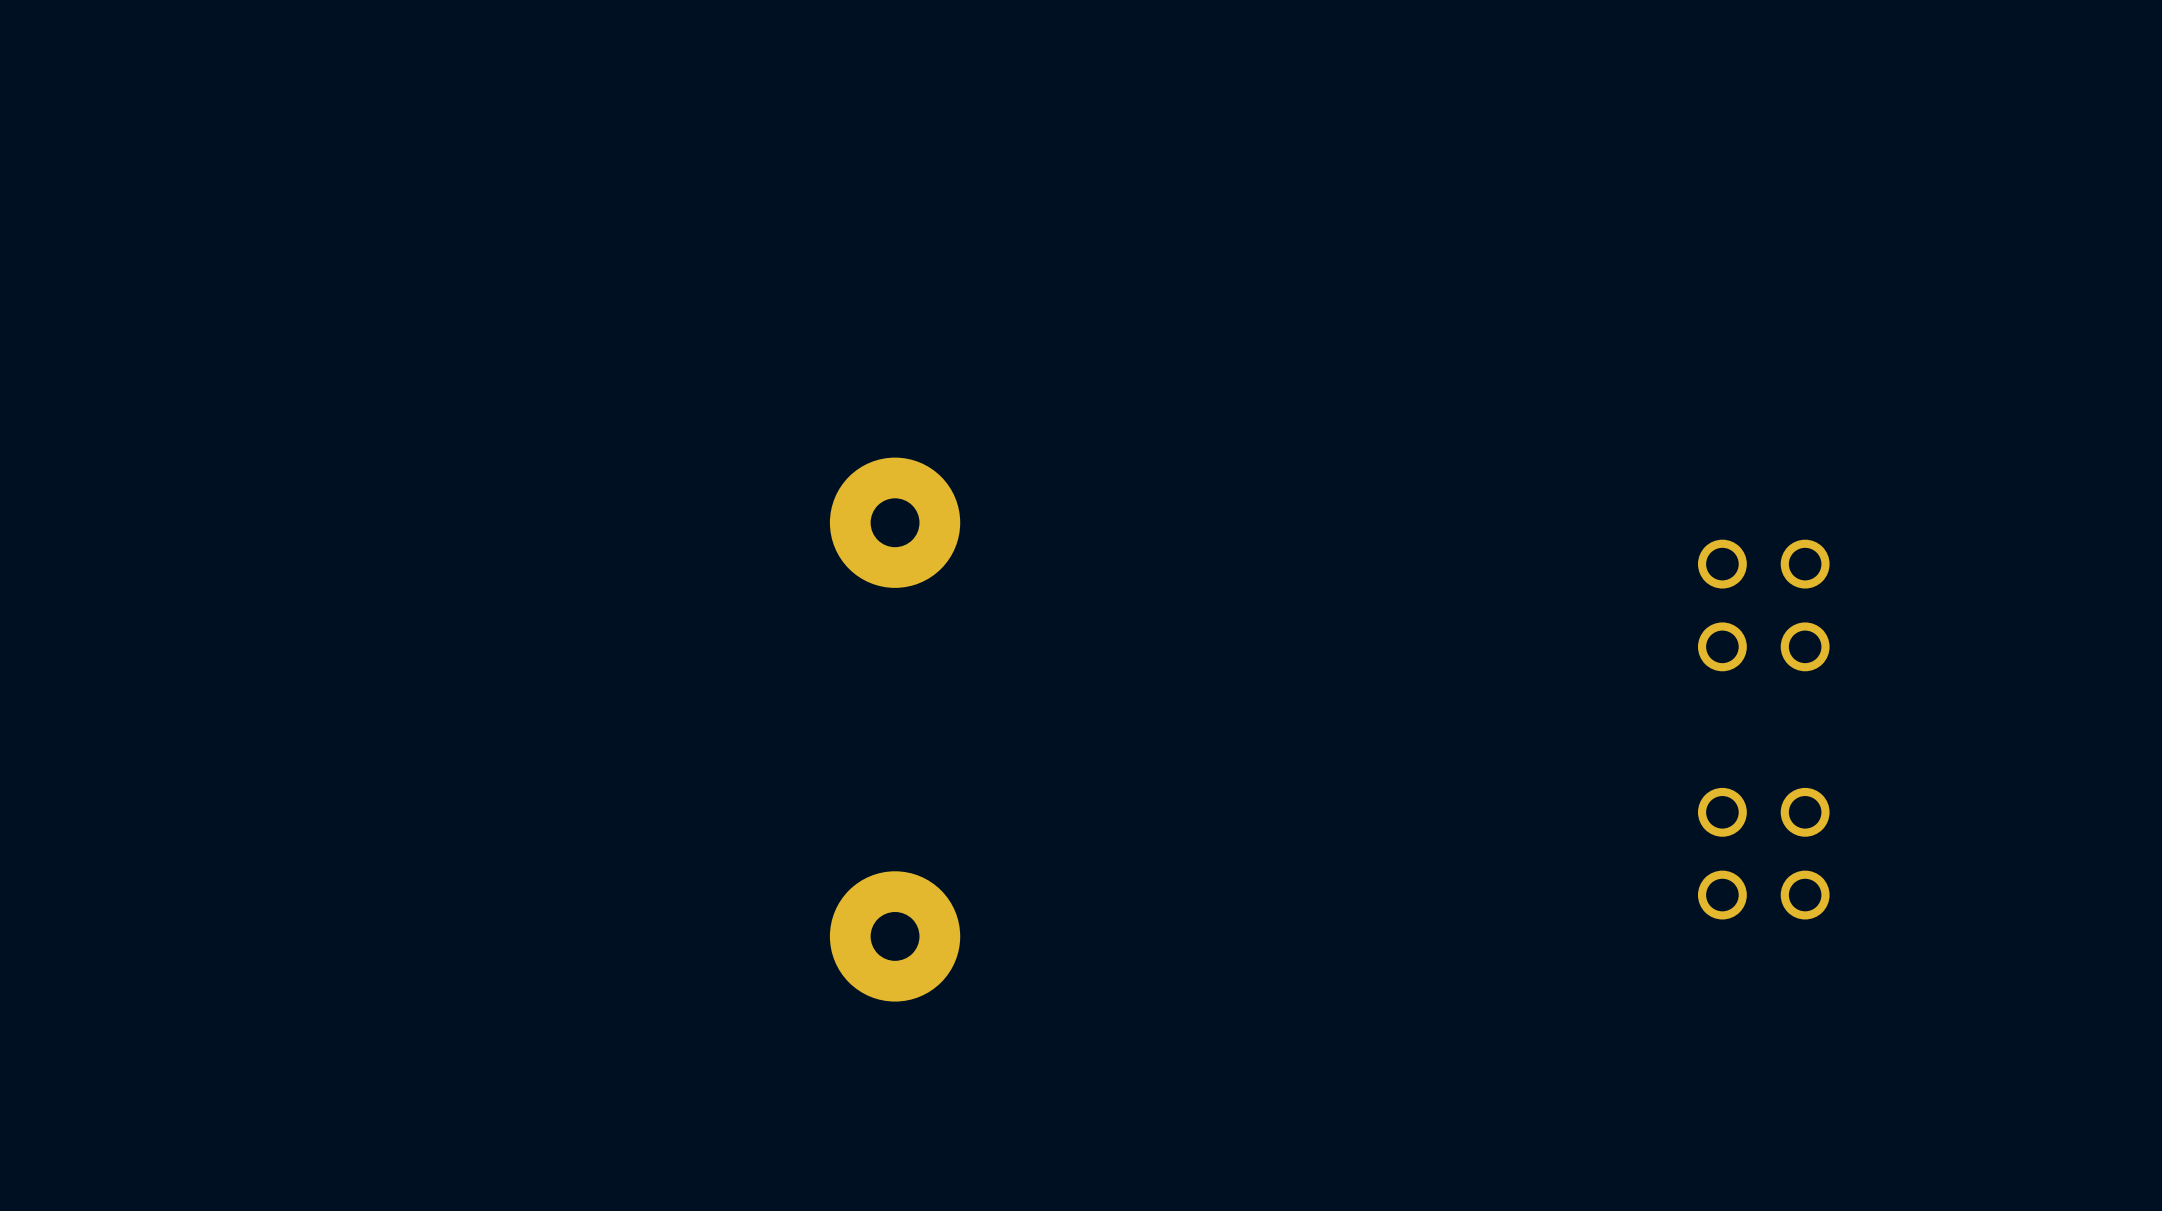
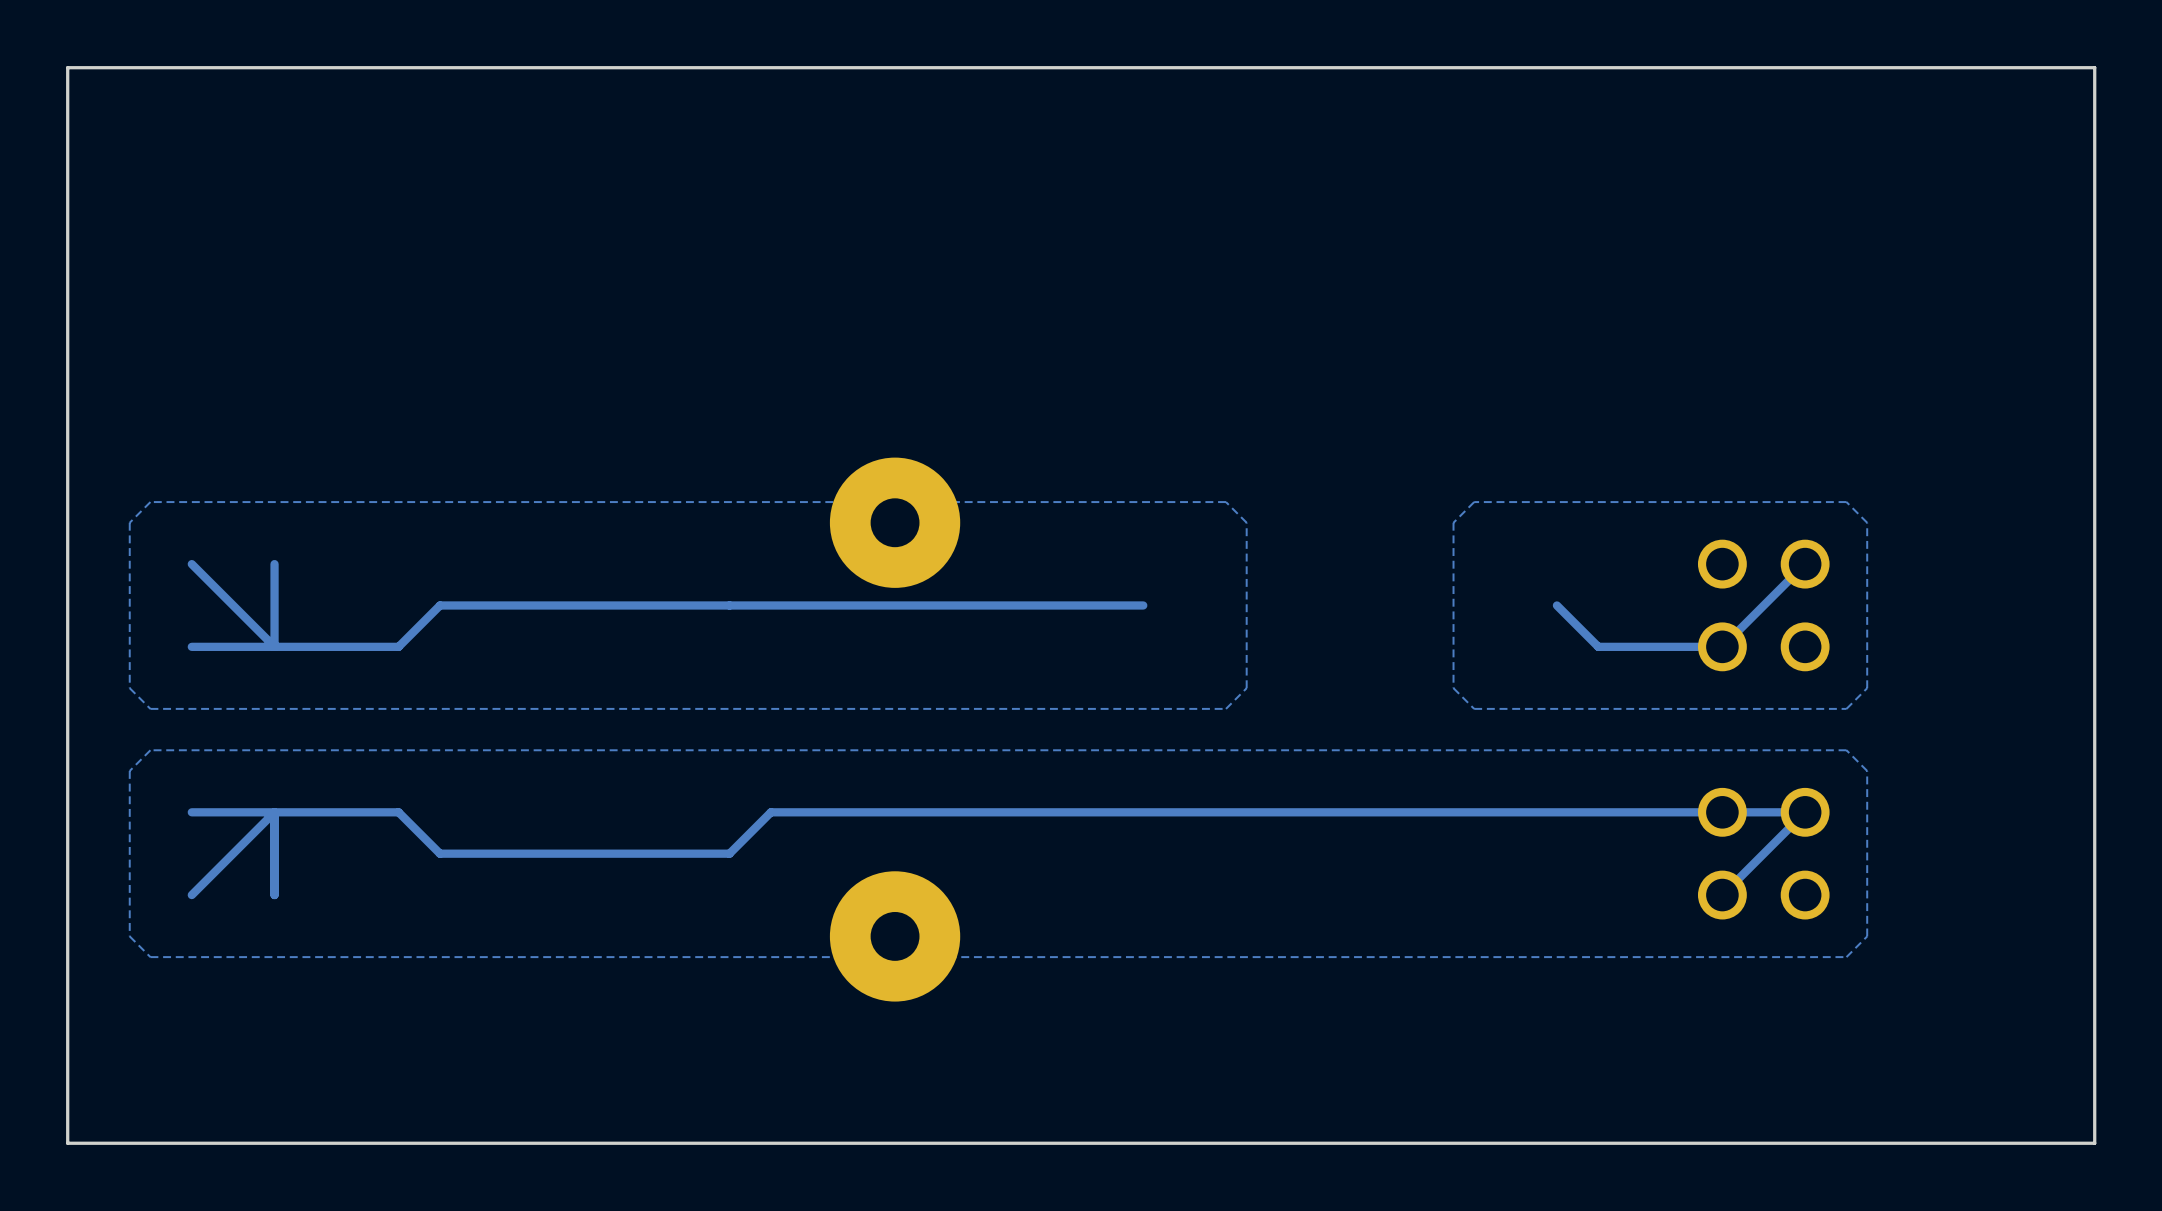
board edge: none -> (2094, 67) (2094, 1143) (67, 1143) (67, 67) (2094, 67)
zone outline: none -> (1225, 502) (150, 502) (129, 522) (129, 688) (150, 708) (1225, 708) (1246, 688) (1246, 522) (1225, 502)
zone outline: none -> (1846, 502) (1867, 522) (1867, 688) (1846, 708) (1474, 708) (1453, 688) (1453, 522) (1474, 502) (1846, 502)
track: none -> (274, 564) (274, 646) (191, 564)
track: none -> (1805, 564) (1722, 646) (1598, 646) (1556, 605)
track: none -> (1143, 605) (440, 605) (398, 646) (191, 646)
zone outline: none -> (1846, 750) (1867, 770) (1867, 936) (1846, 957) (150, 957) (129, 936) (129, 770) (150, 750) (1846, 750)
track: none -> (191, 812) (398, 812) (440, 853) (729, 853) (770, 812) (1805, 812) (1722, 895)
track: none -> (274, 895) (274, 812) (191, 895)

